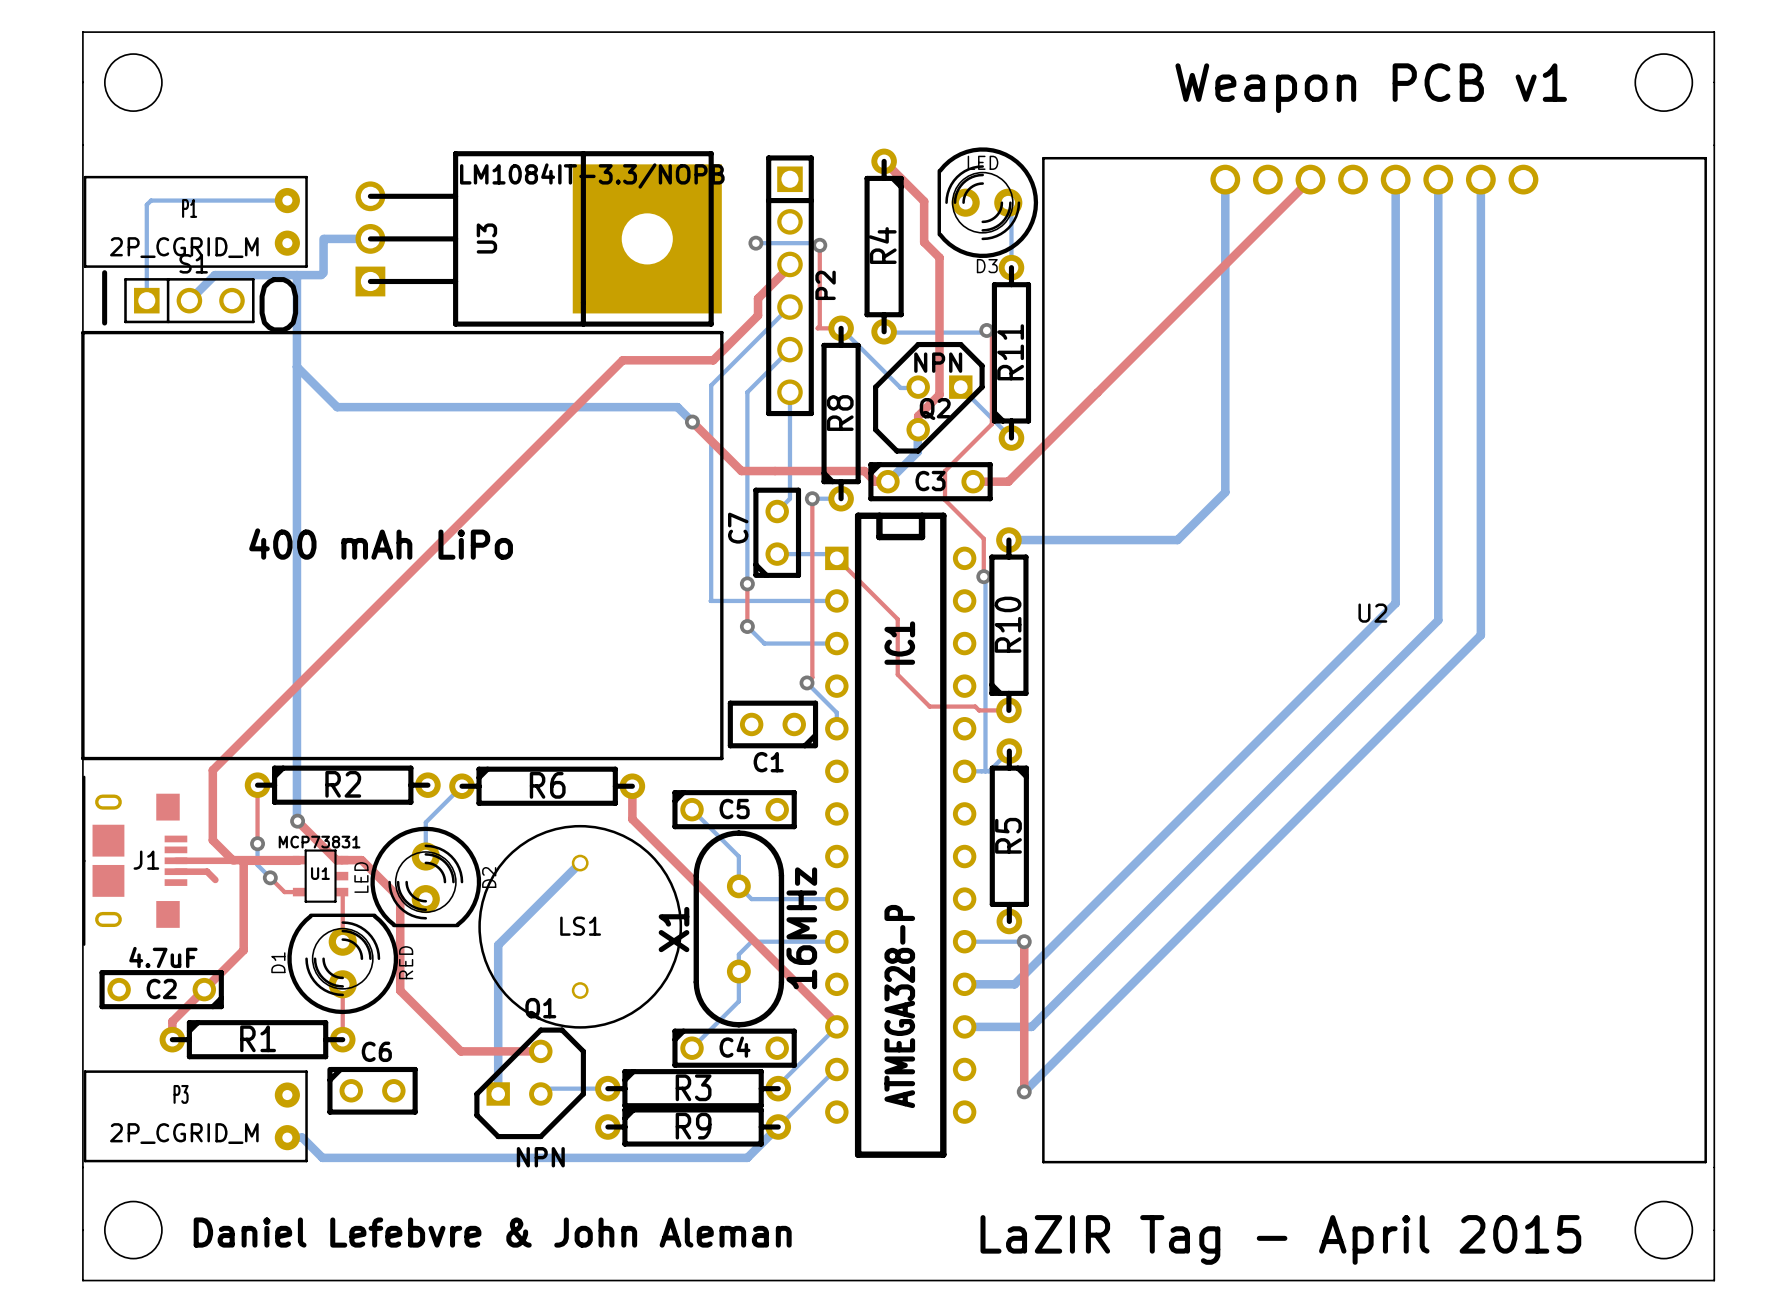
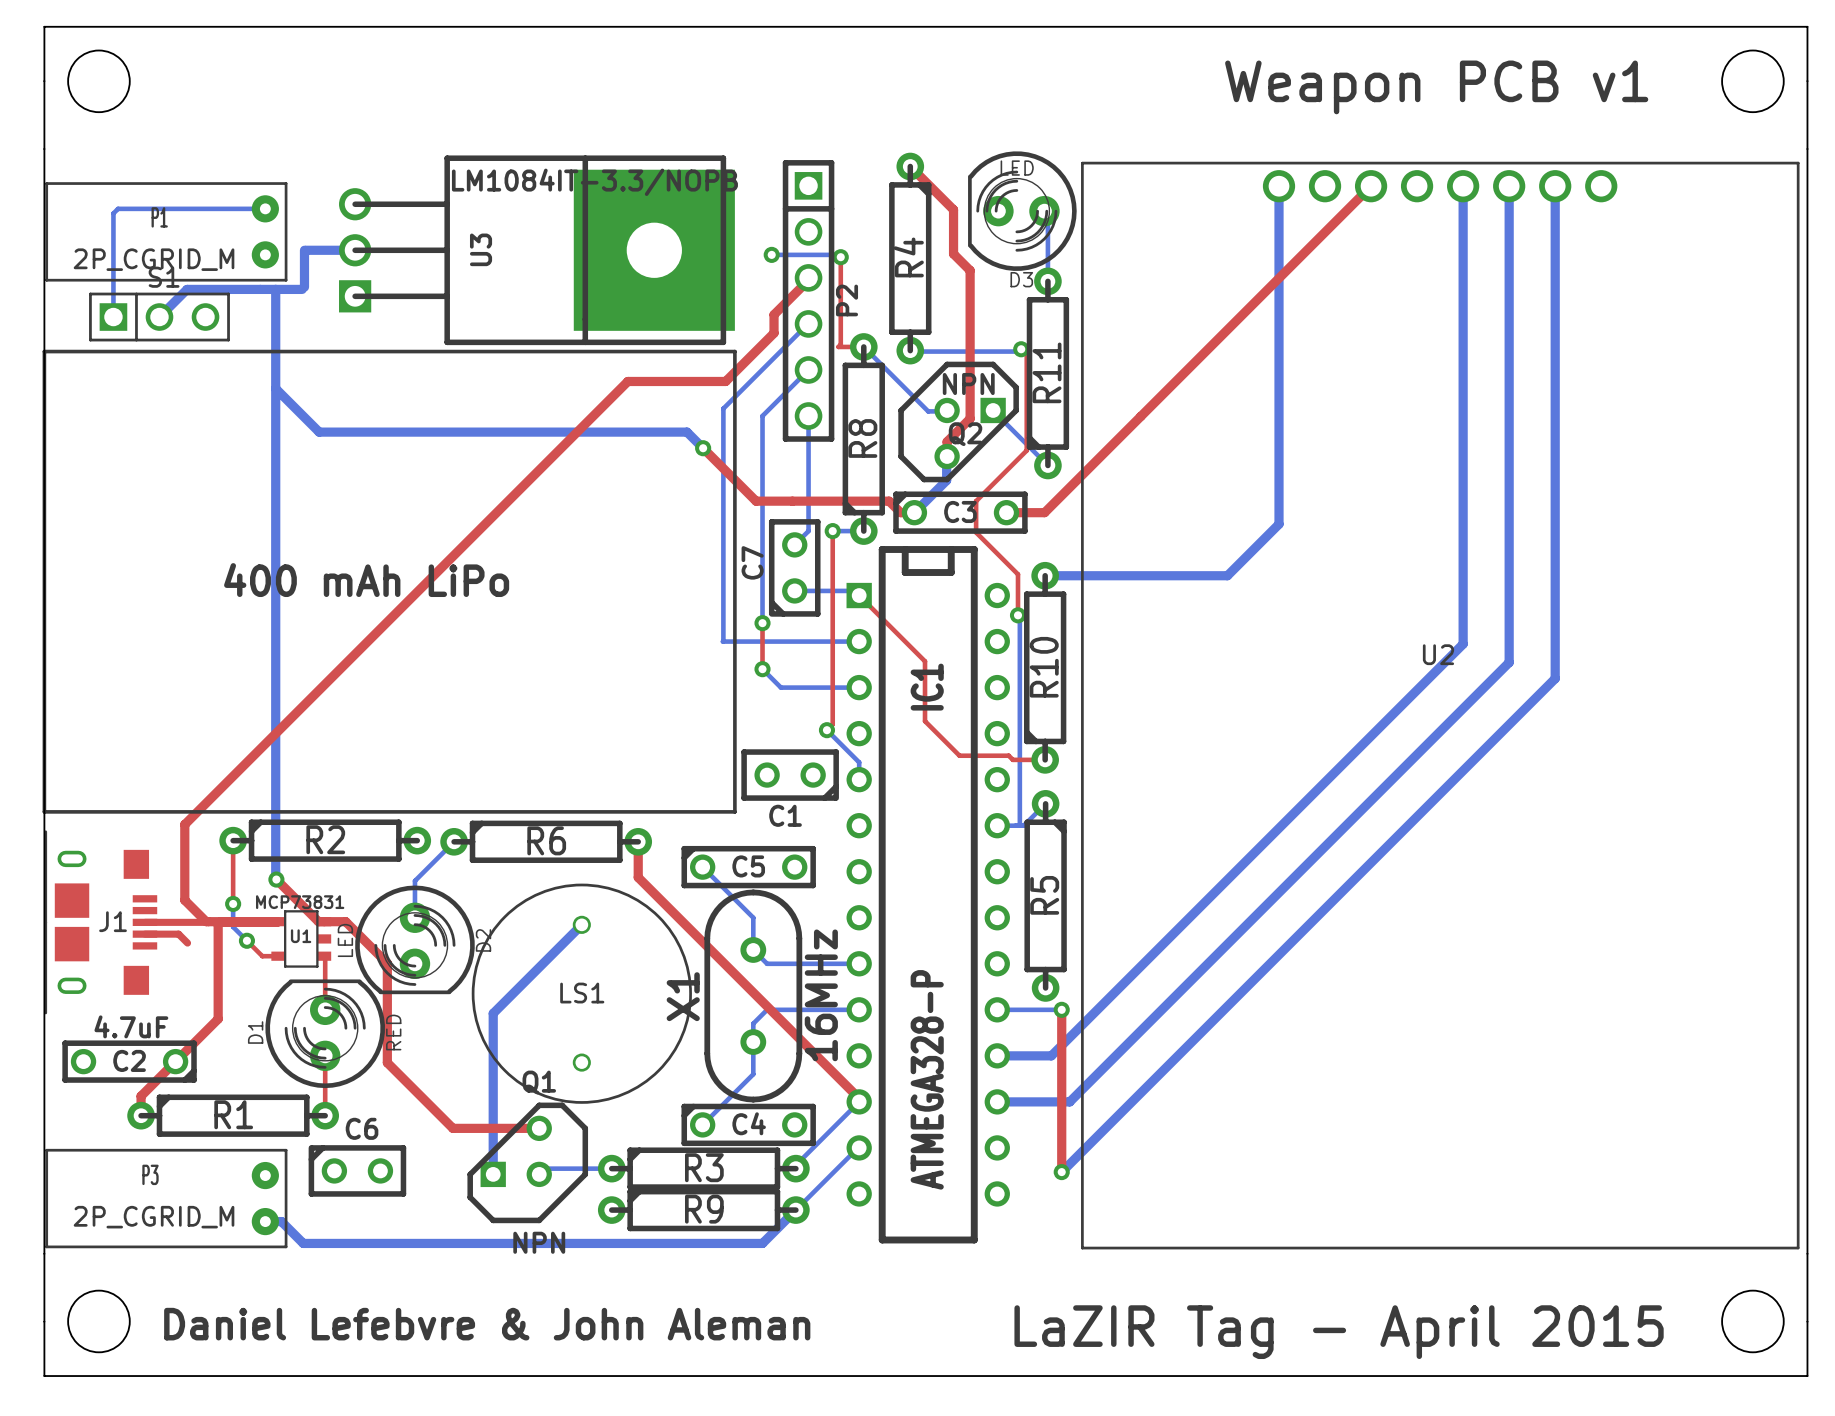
text: I (104, 297) -> none
text: O (278, 304) -> none

